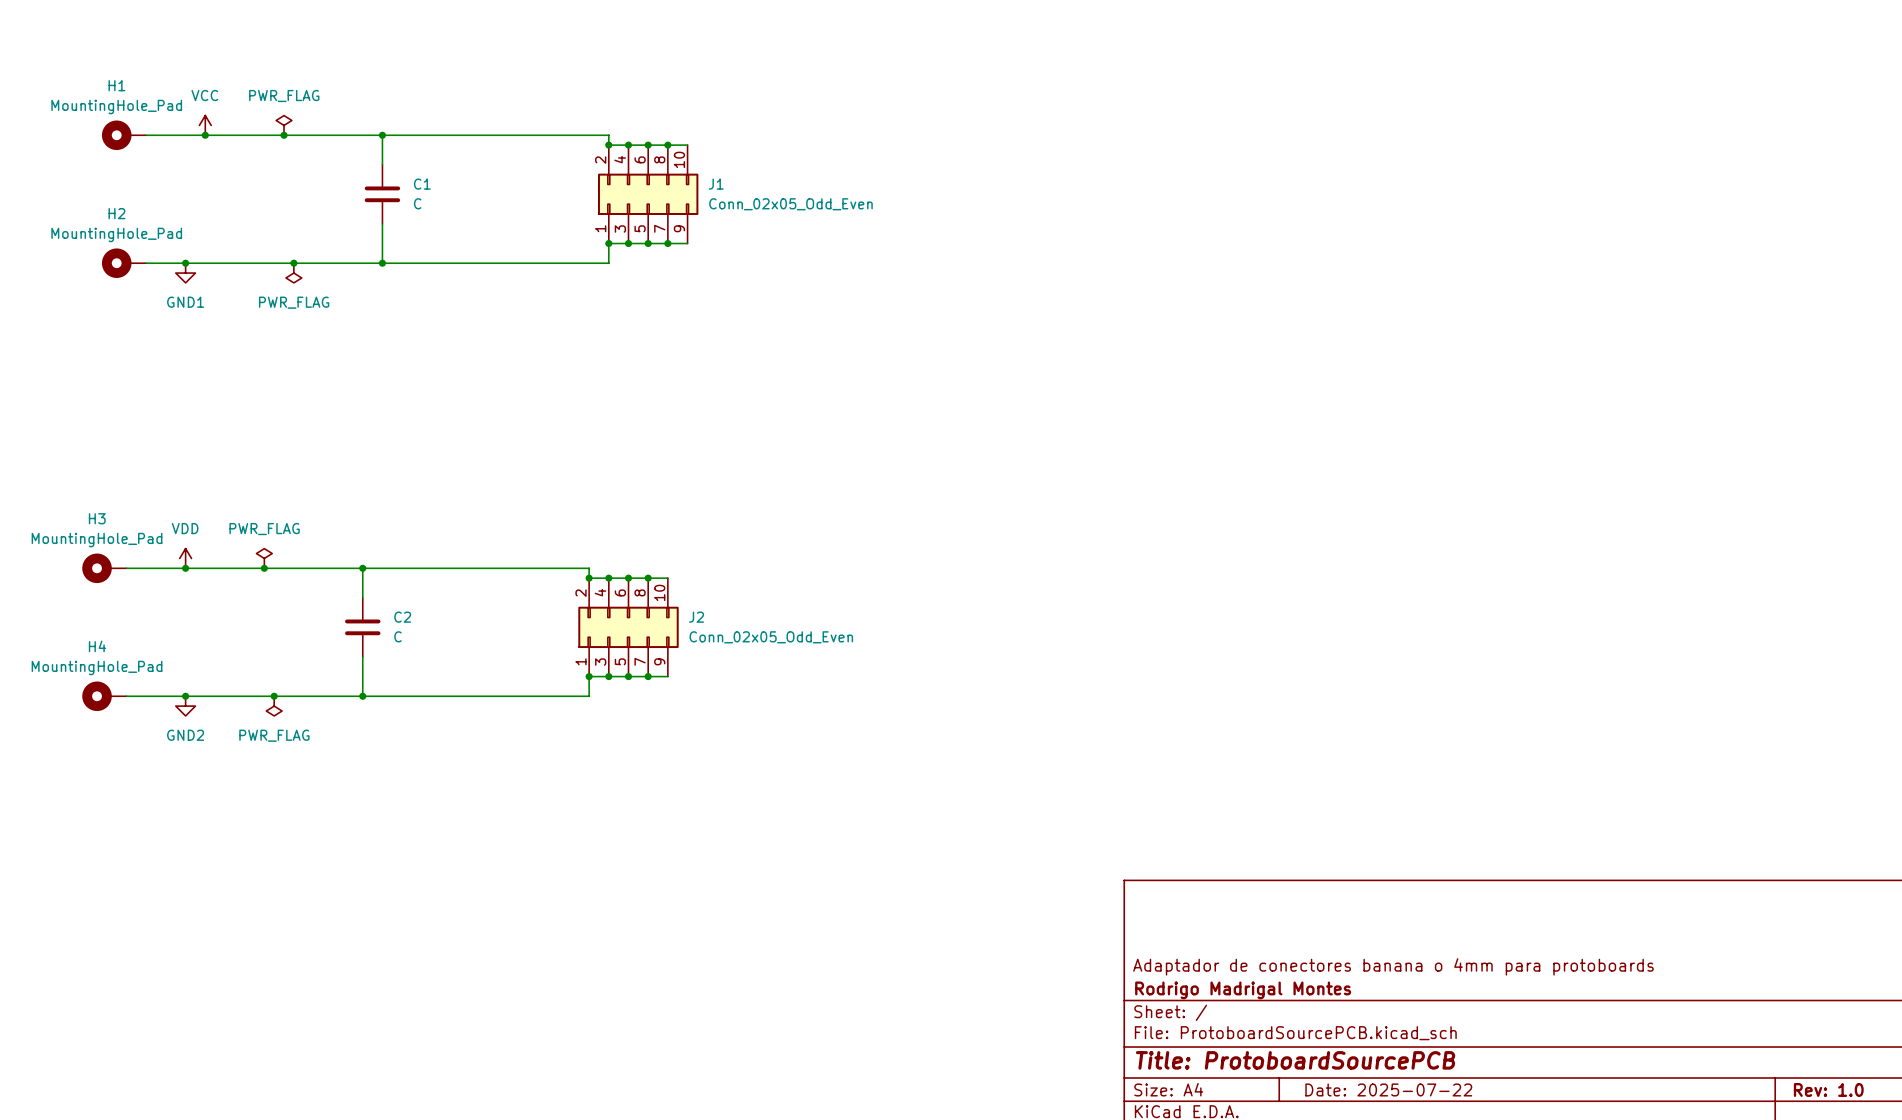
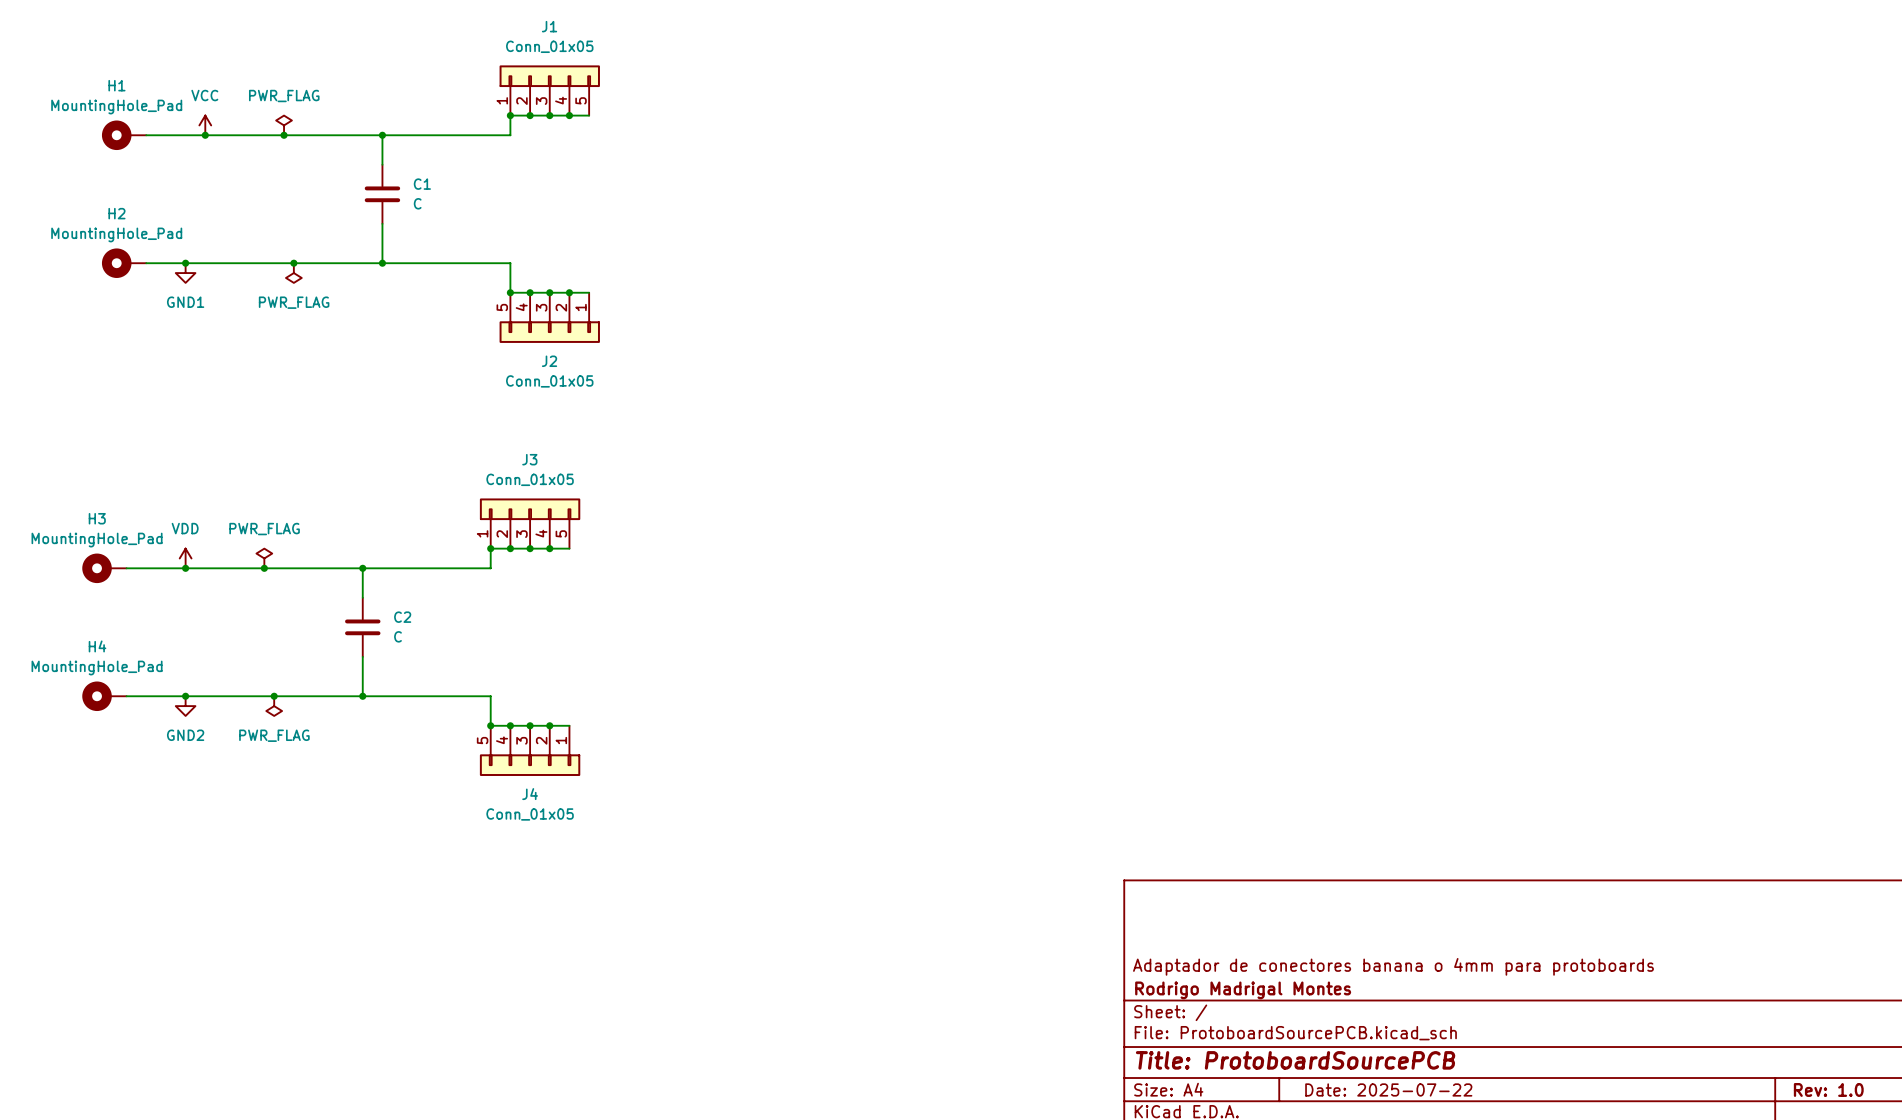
junction: none -> (510, 115)
junction: none -> (530, 115)
junction: none -> (549, 115)
junction: none -> (569, 115)
wire: (510, 135) (608, 135) (608, 145) (687, 145) -> (510, 135) (510, 115) (589, 115)
J1 symbol: [597, 145, 699, 244] -> [499, 65, 600, 116]
junction: (608, 145) -> none
junction: (628, 145) -> none
junction: (648, 145) -> none
junction: (667, 145) -> none
J1 name position: J1 (716, 184) -> J1 (549, 26)
J1 value: Conn_02x05_Odd_Even (790, 204) -> Conn_01x05 (549, 46)
junction: (608, 243) -> none
junction: (628, 243) -> none
junction: (648, 243) -> none
junction: (667, 243) -> none
wire: (687, 243) (608, 243) (608, 263) (510, 263) -> (589, 292) (510, 292) (510, 263)
junction: none -> (510, 292)
junction: none -> (530, 292)
junction: none -> (549, 292)
junction: none -> (569, 292)
J3: none -> Conn_01x05 (530, 523)
junction: none -> (490, 548)
junction: none -> (510, 548)
junction: none -> (530, 548)
junction: none -> (549, 548)
wire: (490, 568) (589, 568) (589, 578) (667, 578) -> (490, 568) (490, 548) (569, 548)
J2 symbol: [578, 578, 679, 677] -> [499, 292, 600, 343]
junction: (589, 578) -> none
junction: (608, 578) -> none
junction: (628, 578) -> none
junction: (648, 578) -> none
J2 name position: J2 (696, 617) -> J2 (549, 361)
J2 value: Conn_02x05_Odd_Even (771, 637) -> Conn_01x05 (549, 381)
junction: (589, 676) -> none
junction: (608, 676) -> none
junction: (628, 676) -> none
junction: (648, 676) -> none
wire: (667, 676) (589, 676) (589, 696) (490, 696) -> (569, 725) (490, 725) (490, 696)
junction: none -> (490, 725)
junction: none -> (510, 725)
junction: none -> (530, 725)
junction: none -> (549, 725)
J4: none -> Conn_01x05 (530, 750)

